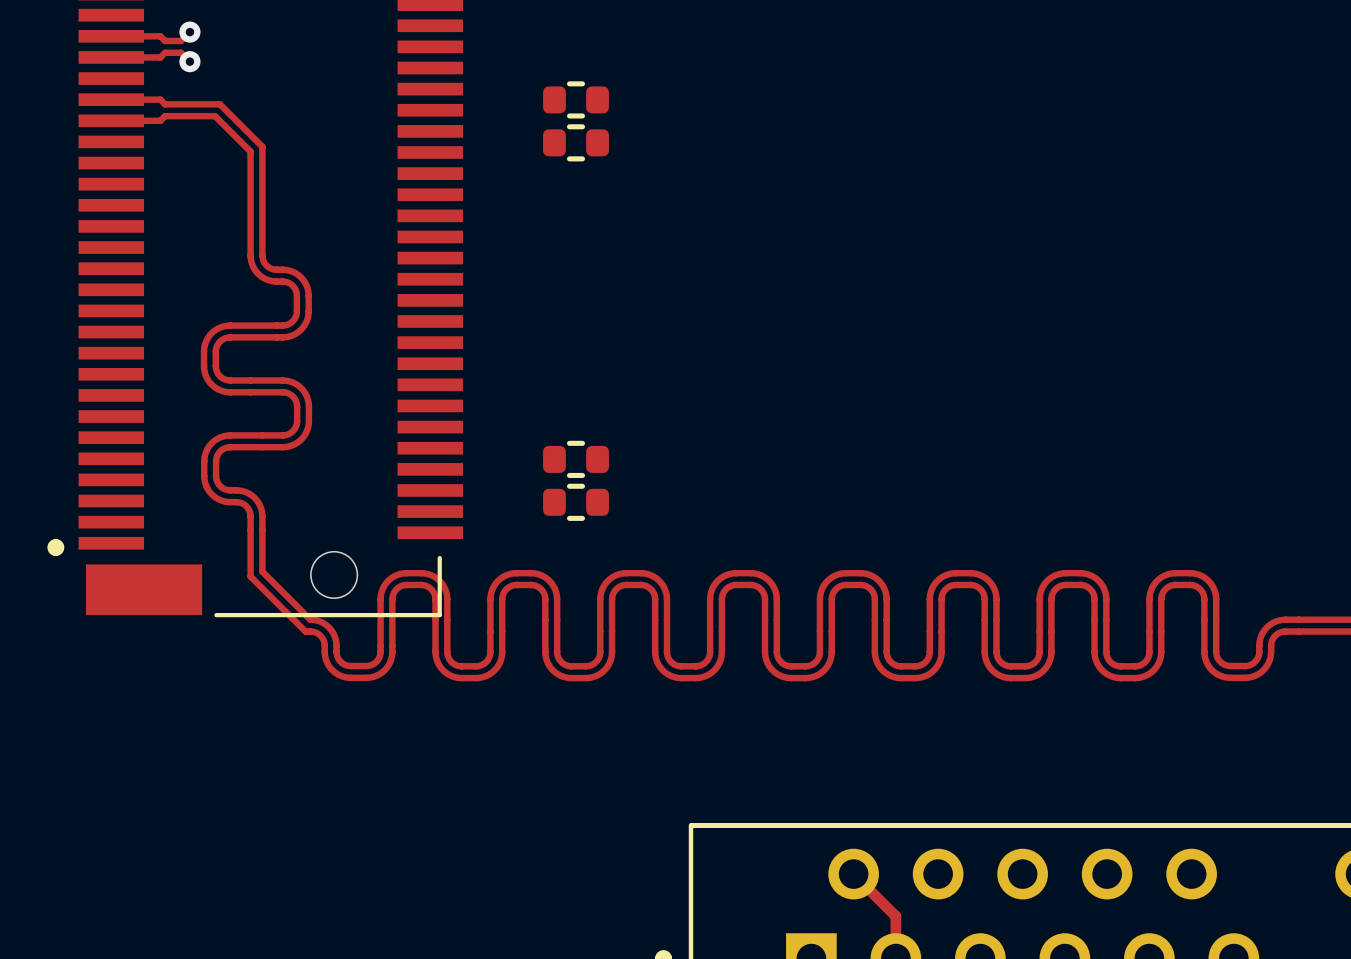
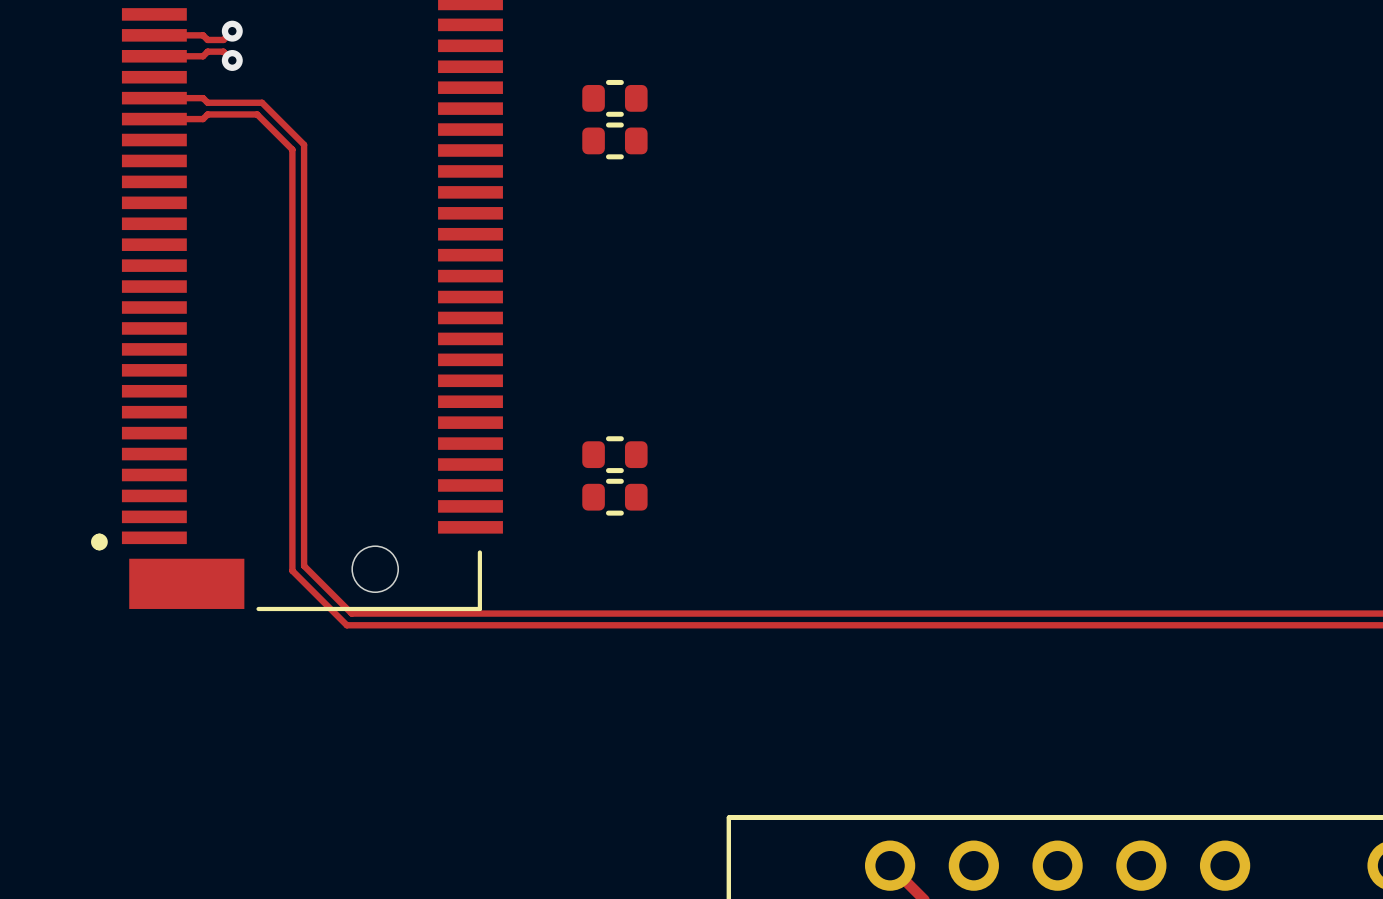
track: (250, 255) (253, 266) (260, 275) (270, 280) (287, 282) (293, 286) (296, 294) (296, 315) (292, 321) (285, 325) (227, 325) (216, 329) (209, 335) (204, 345) (205, 374) (211, 384) (221, 390) (285, 392) (293, 397) (297, 406) (296, 425) (288, 433) (224, 436) (214, 441) (206, 450) (204, 458) (204, 476) (208, 489) (221, 500) (243, 504) (248, 509) (250, 516) -> (292, 252) (292, 511)
track: (262, 255) (263, 261) (269, 267) (291, 271) (304, 281) (308, 292) (307, 319) (298, 331) (288, 336) (230, 337) (223, 339) (216, 348) (216, 369) (221, 377) (228, 380) (282, 380) (292, 382) (303, 390) (308, 406) (306, 431) (295, 443) (282, 447) (228, 447) (221, 450) (217, 456) (216, 476) (219, 484) (226, 489) (242, 490) (252, 496) (259, 505) (262, 516) -> (304, 252) (304, 511)
track: (310, 619) (320, 621) (331, 629) (335, 639) (337, 656) (341, 662) (350, 666) (372, 664) (377, 660) (380, 653) (380, 599) (382, 589) (393, 576) (406, 573) (431, 575) (443, 586) (447, 599) (447, 655) (452, 663) (461, 666) (479, 665) (488, 659) (490, 651) (491, 592) (500, 578) (516, 573) (540, 575) (553, 586) (557, 599) (557, 655) (562, 663) (571, 666) (589, 665) (598, 659) (600, 651) (601, 592) (610, 578) (626, 573) (650, 575) (663, 586) (666, 599) (667, 655) (671, 662) (679, 666) (698, 665) (707, 659) (710, 651) (710, 592) (717, 580) (732, 573) (757, 574) (766, 578) (773, 586) (776, 599) (777, 655) (782, 663) (789, 666) (809, 665) (818, 659) (819, 651) (820, 592) (827, 580) (842, 573) (867, 574) (876, 578) (883, 586) (886, 599) (887, 655) (890, 662) (899, 666) (918, 665) (927, 659) (929, 651) (930, 592) (940, 578) (952, 573) (977, 574) (986, 578) (992, 586) (996, 599) (997, 655) (1000, 662) (1009, 666) (1028, 665) (1037, 659) (1039, 651) (1040, 592) (1047, 580) (1062, 573) (1086, 574) (1096, 578) (1102, 586) (1106, 599) (1106, 655) (1110, 662) (1117, 665) (1138, 665) (1147, 659) (1149, 651) (1150, 593) (1157, 580) (1169, 573) (1195, 573) (1203, 577) (1212, 585) (1216, 596) (1216, 654) (1219, 660) (1225, 665) (1246, 665) (1253, 662) (1258, 656) (1260, 639) (1264, 629) (1275, 621) (1285, 619) -> (351, 613) (1318, 613)
track: (310, 631) (316, 632) (322, 638) (326, 661) (334, 672) (347, 677) (376, 675) (384, 670) (391, 658) (393, 594) (397, 588) (406, 584) (424, 585) (433, 591) (435, 599) (436, 658) (445, 672) (461, 678) (486, 676) (498, 664) (502, 651) (502, 596) (507, 588) (515, 585) (534, 585) (543, 591) (545, 599) (546, 660) (555, 672) (568, 677) (594, 676) (608, 665) (611, 654) (612, 596) (617, 588) (624, 585) (643, 585) (652, 591) (655, 599) (656, 658) (665, 672) (677, 677) (702, 677) (711, 672) (718, 664) (721, 651) (722, 596) (726, 589) (734, 585) (753, 585) (762, 591) (765, 599) (766, 660) (774, 672) (788, 677) (814, 676) (827, 665) (831, 654) (832, 596) (837, 588) (844, 585) (863, 585) (872, 591) (874, 599) (875, 658) (885, 672) (897, 677) (922, 677) (931, 672) (938, 664) (941, 651) (941, 596) (945, 589) (954, 585) (973, 585) (982, 591) (984, 599) (986, 660) (994, 672) (1008, 677) (1033, 676) (1047, 665) (1051, 654) (1051, 596) (1056, 588) (1064, 585) (1083, 585) (1093, 593) (1095, 658) (1102, 670) (1113, 677) (1141, 677) (1151, 672) (1157, 664) (1161, 651) (1161, 597) (1164, 590) (1171, 585) (1193, 585) (1202, 592) (1204, 599) (1205, 658) (1212, 670) (1220, 675) (1248, 677) (1260, 672) (1269, 661) (1273, 638) (1279, 632) (1285, 631) -> (351, 625) (1318, 625)

